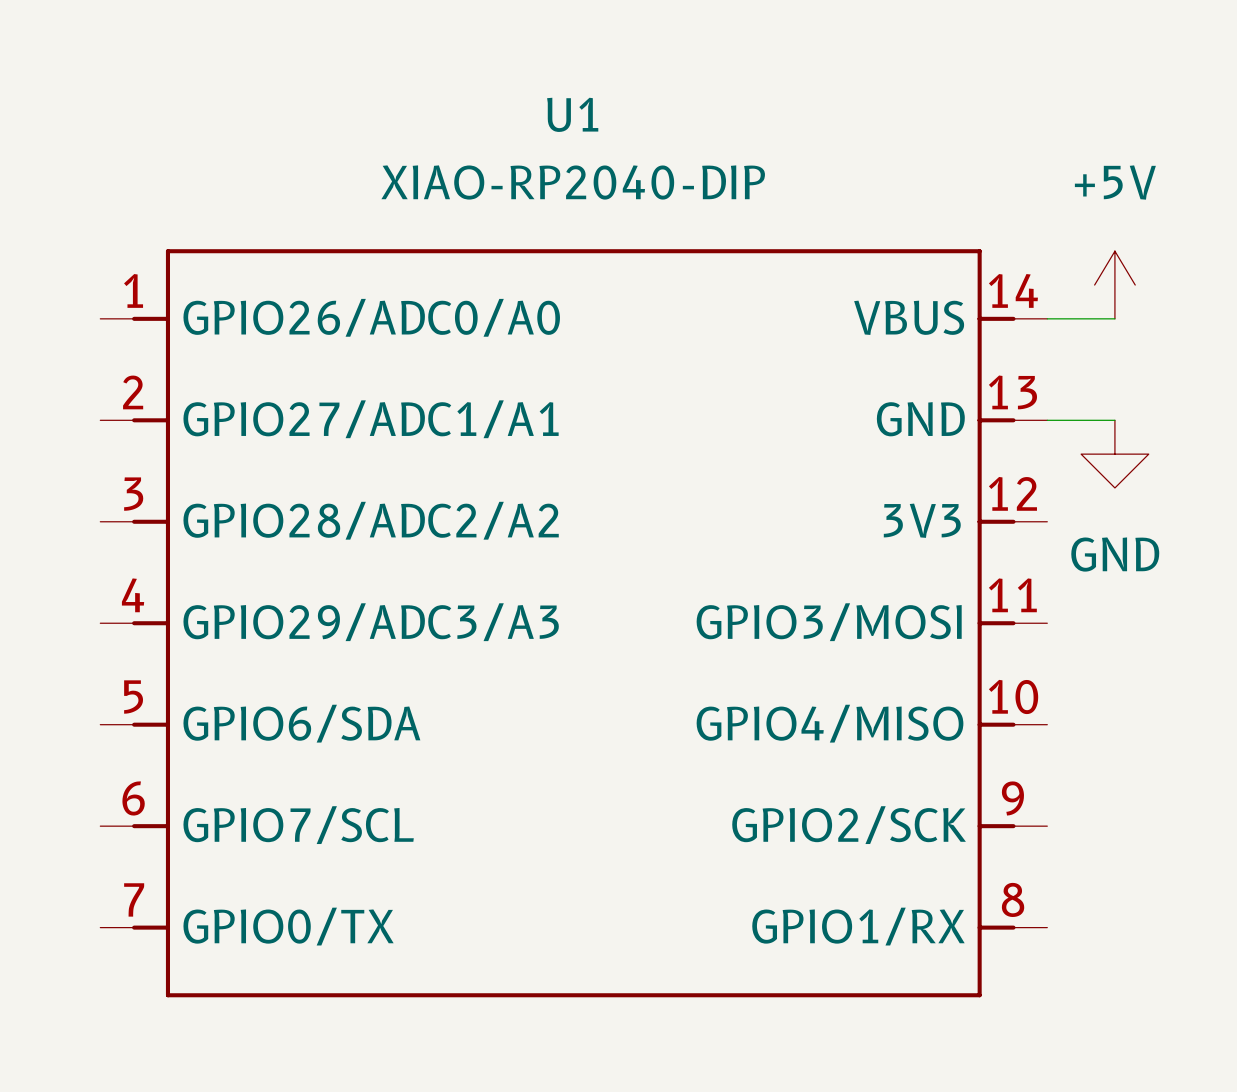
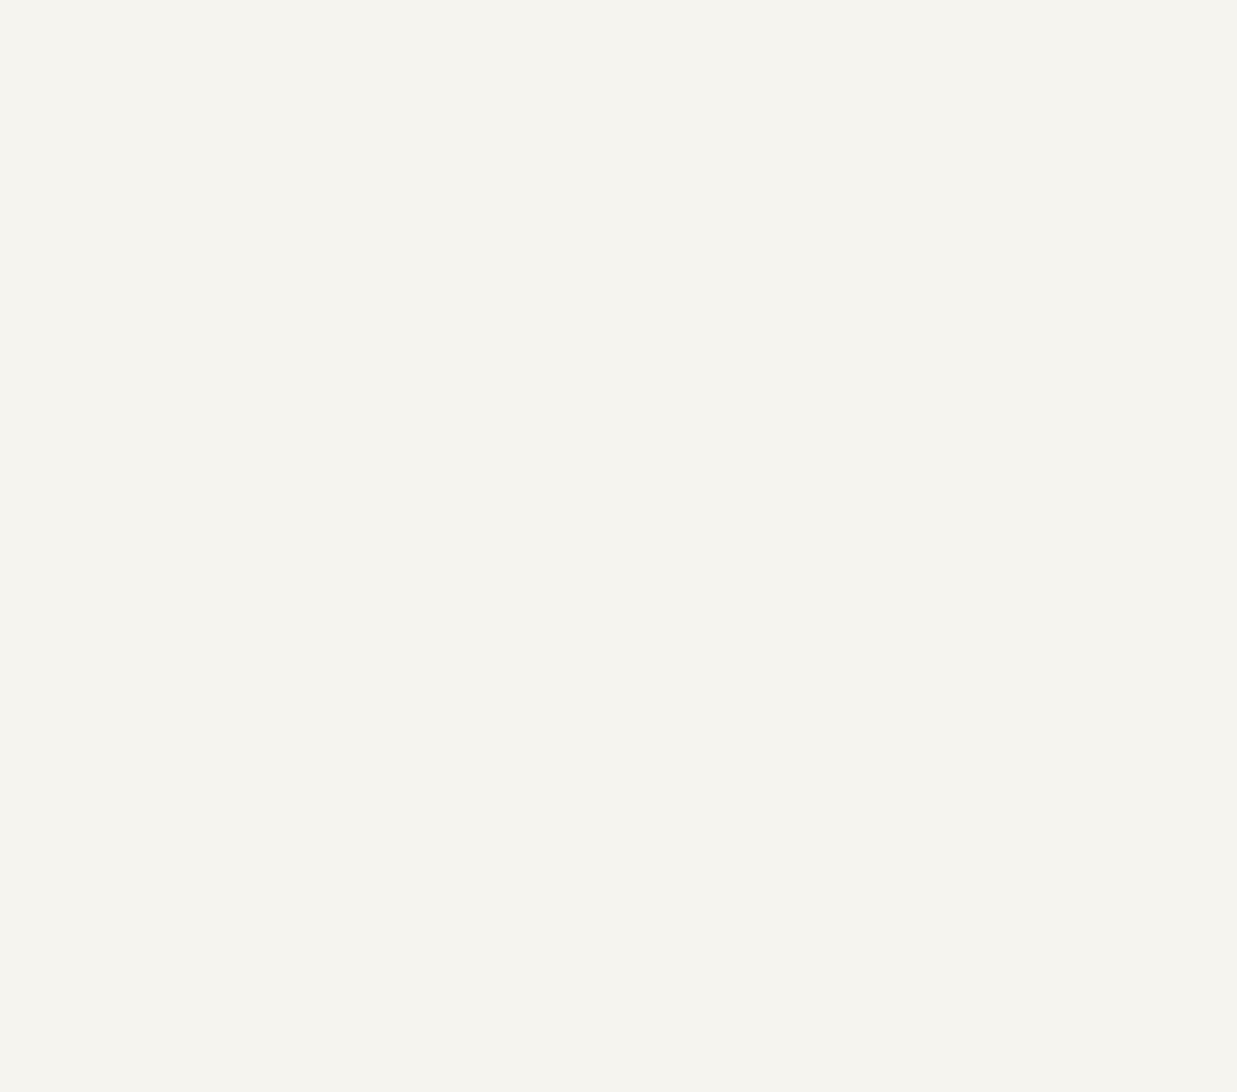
power symbol: +5V (1114, 285) -> none
wire: (1047, 318) (1114, 318) -> none
wire: (1047, 420) (1114, 420) -> none
power symbol: GND (1114, 454) -> none
U1: XIAO-RP2040-DIP (573, 623) -> none

